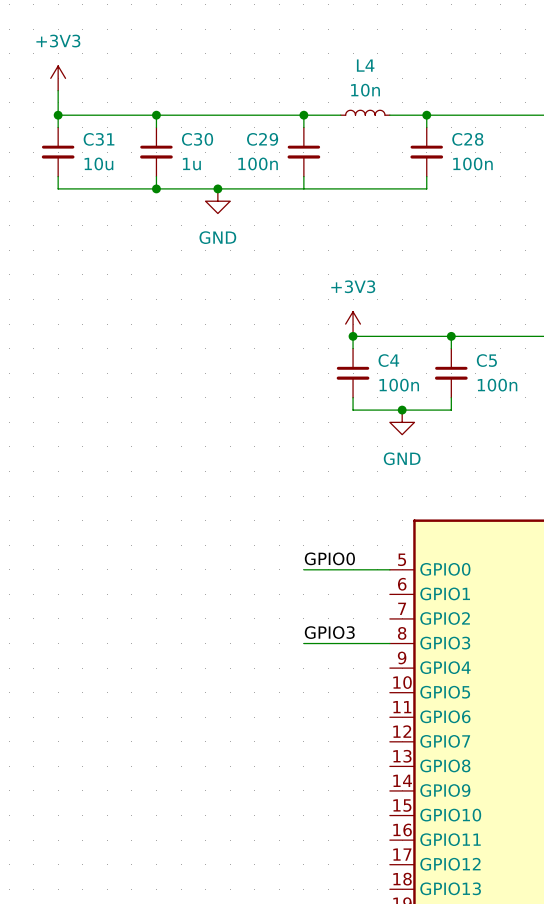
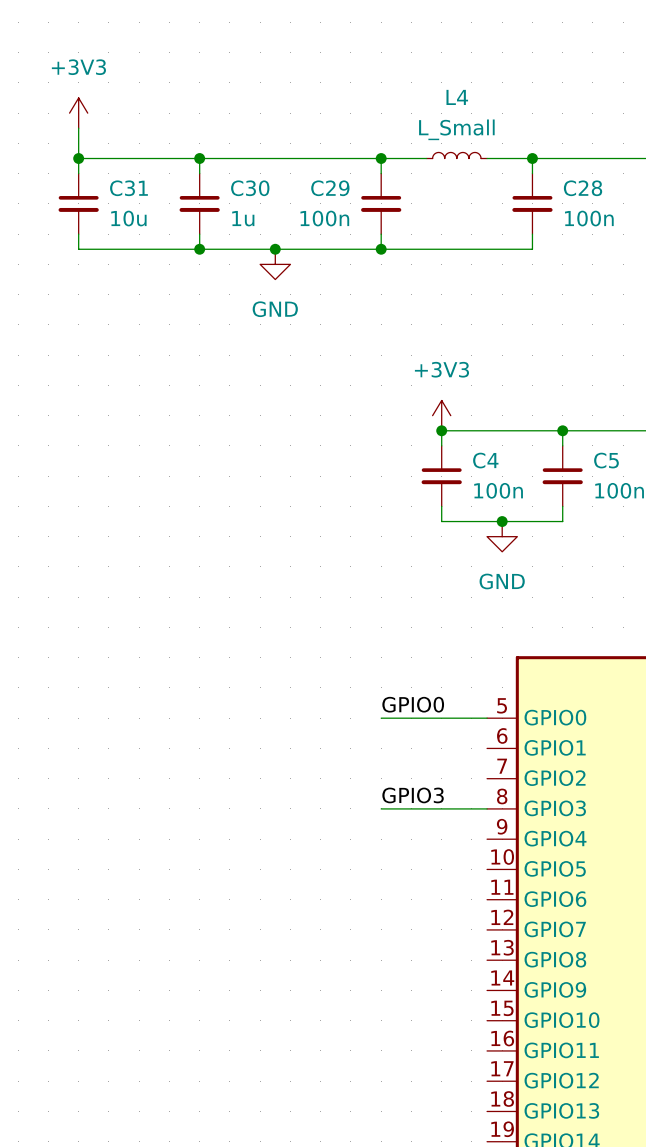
L4 value: 10n (365, 90) -> L_Small (456, 129)
junction: none -> (381, 249)

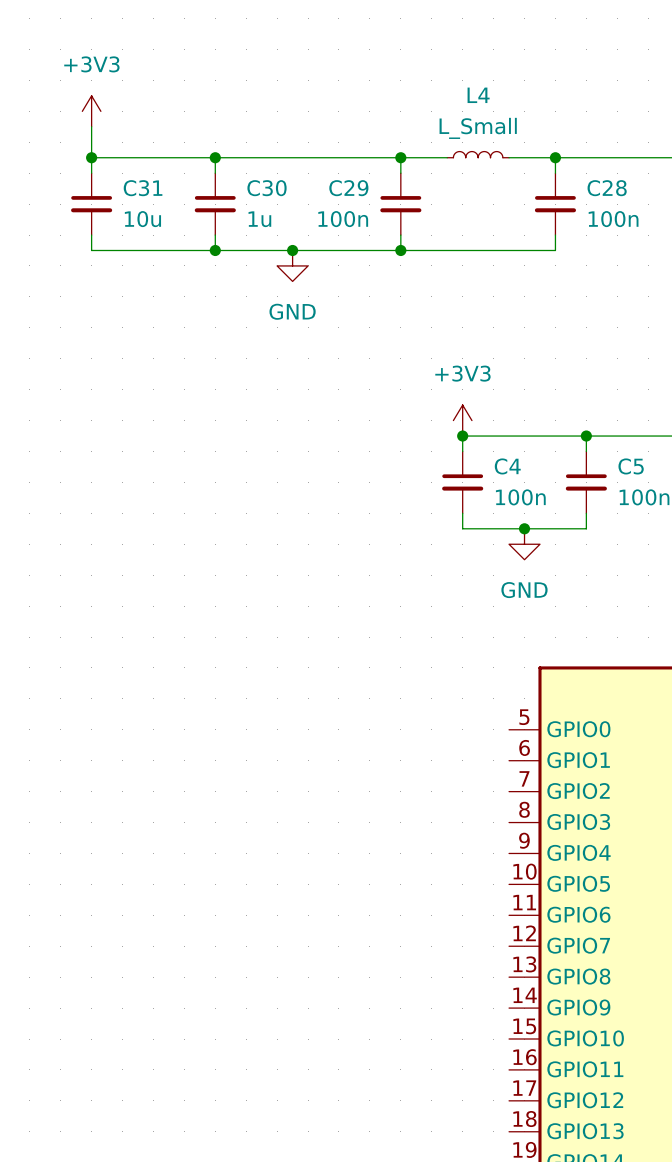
label: GPIO0 (413, 704) -> none
wire: (381, 718) (487, 718) -> none
label: GPIO3 (413, 795) -> none
wire: (381, 808) (487, 808) -> none

